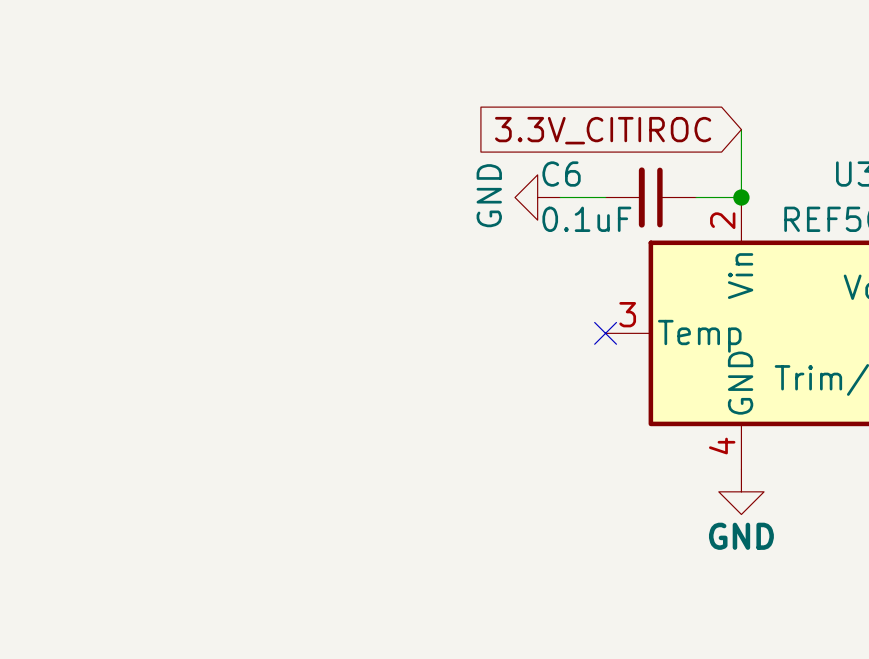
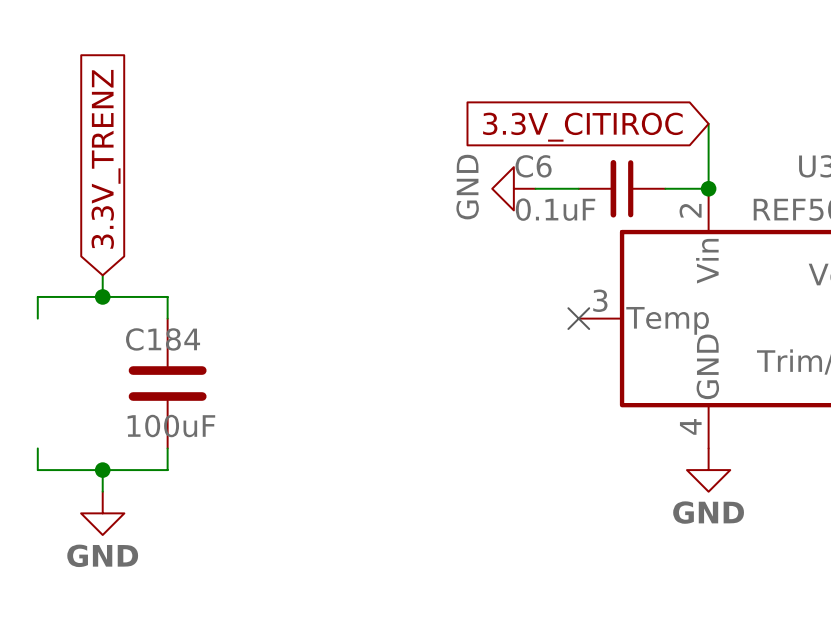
global label: none -> 3.3V_TRENZ (106, 159)
wire: none -> (102, 275) (102, 296)
junction: none -> (102, 296)
wire: none -> (37, 318) (37, 296) (167, 296) (167, 318)
C184: none -> 100uF (167, 383)
wire: none -> (37, 448) (37, 470) (167, 470) (167, 448)
wire: none -> (102, 470) (102, 491)
junction: none -> (102, 470)
power symbol: none -> GND (102, 513)

